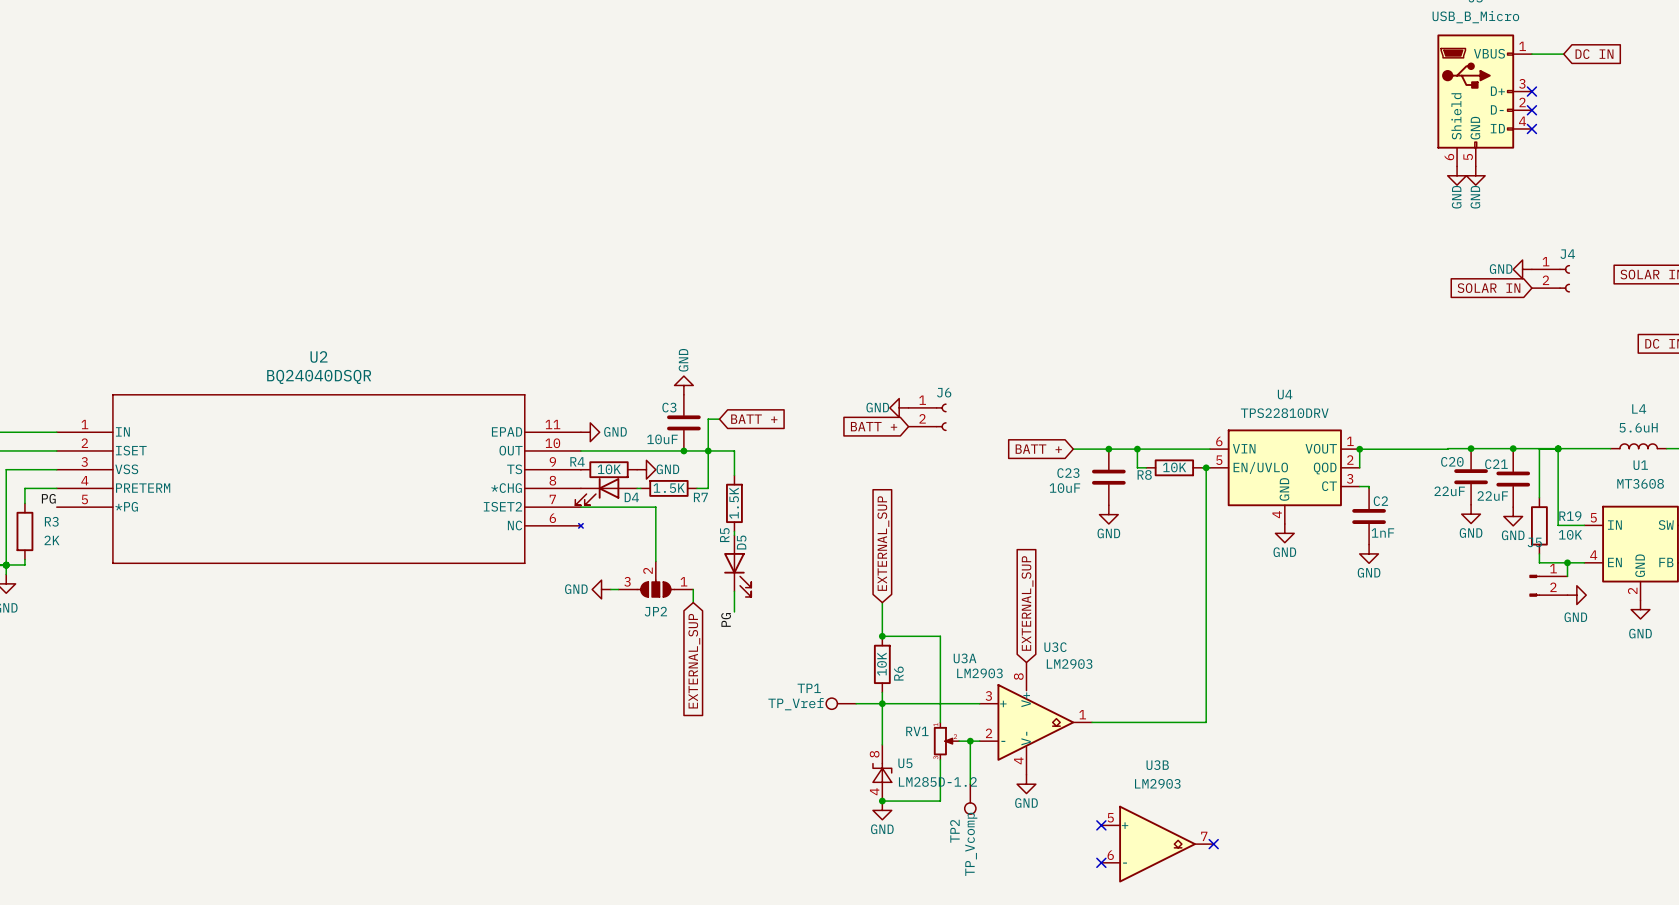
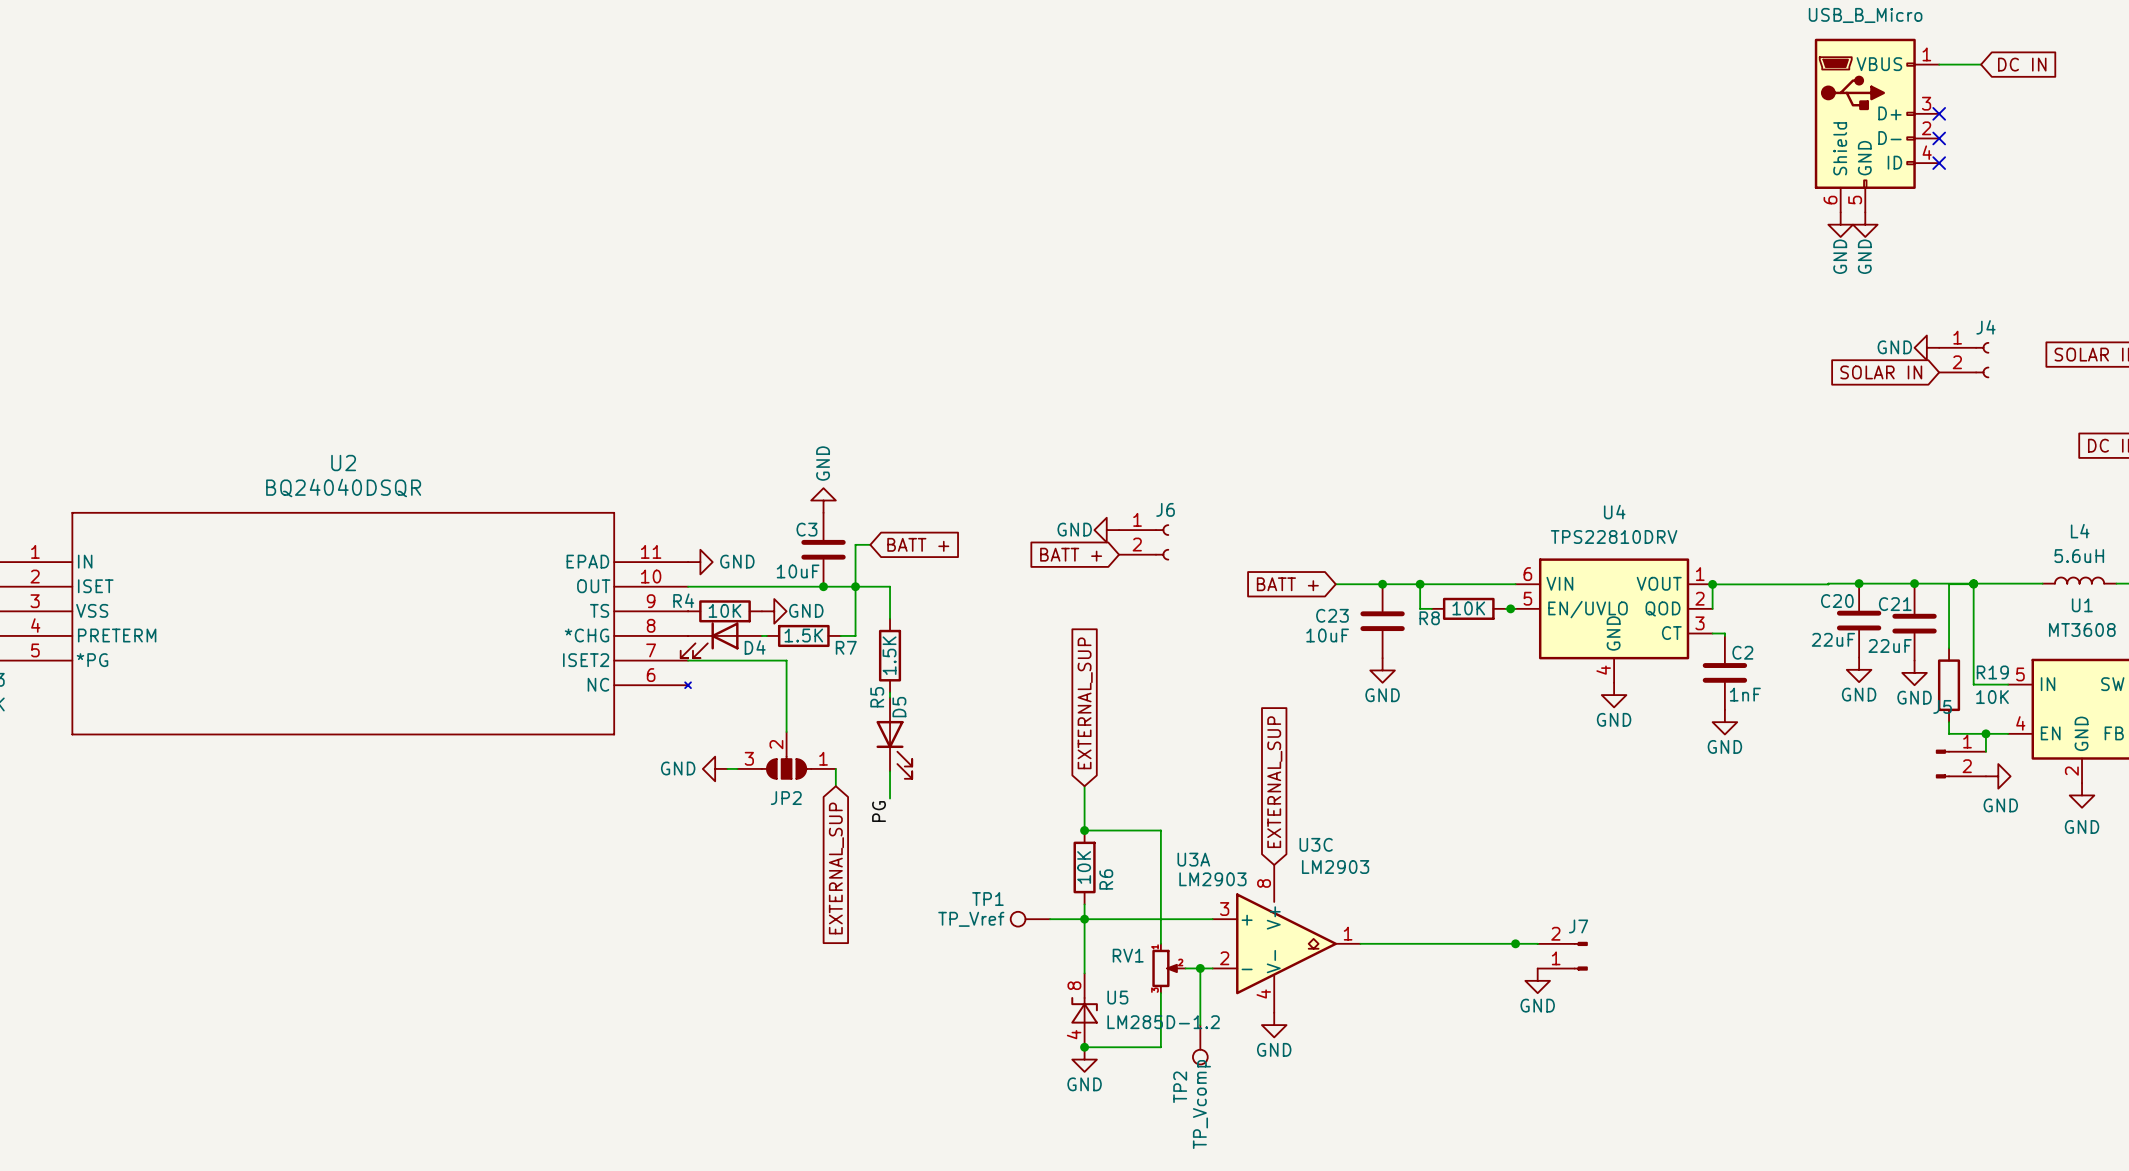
wire: (1206, 467) (1206, 722) -> (1537, 943) (1510, 943)
junction: none -> (1515, 943)
J7: none -> (1562, 956)
power symbol: none -> GND (1537, 980)
no-connect mark: (1101, 825) -> none
U3B: LM2903 (1157, 844) -> none
no-connect mark: (1213, 844) -> none
no-connect mark: (1101, 862) -> none

